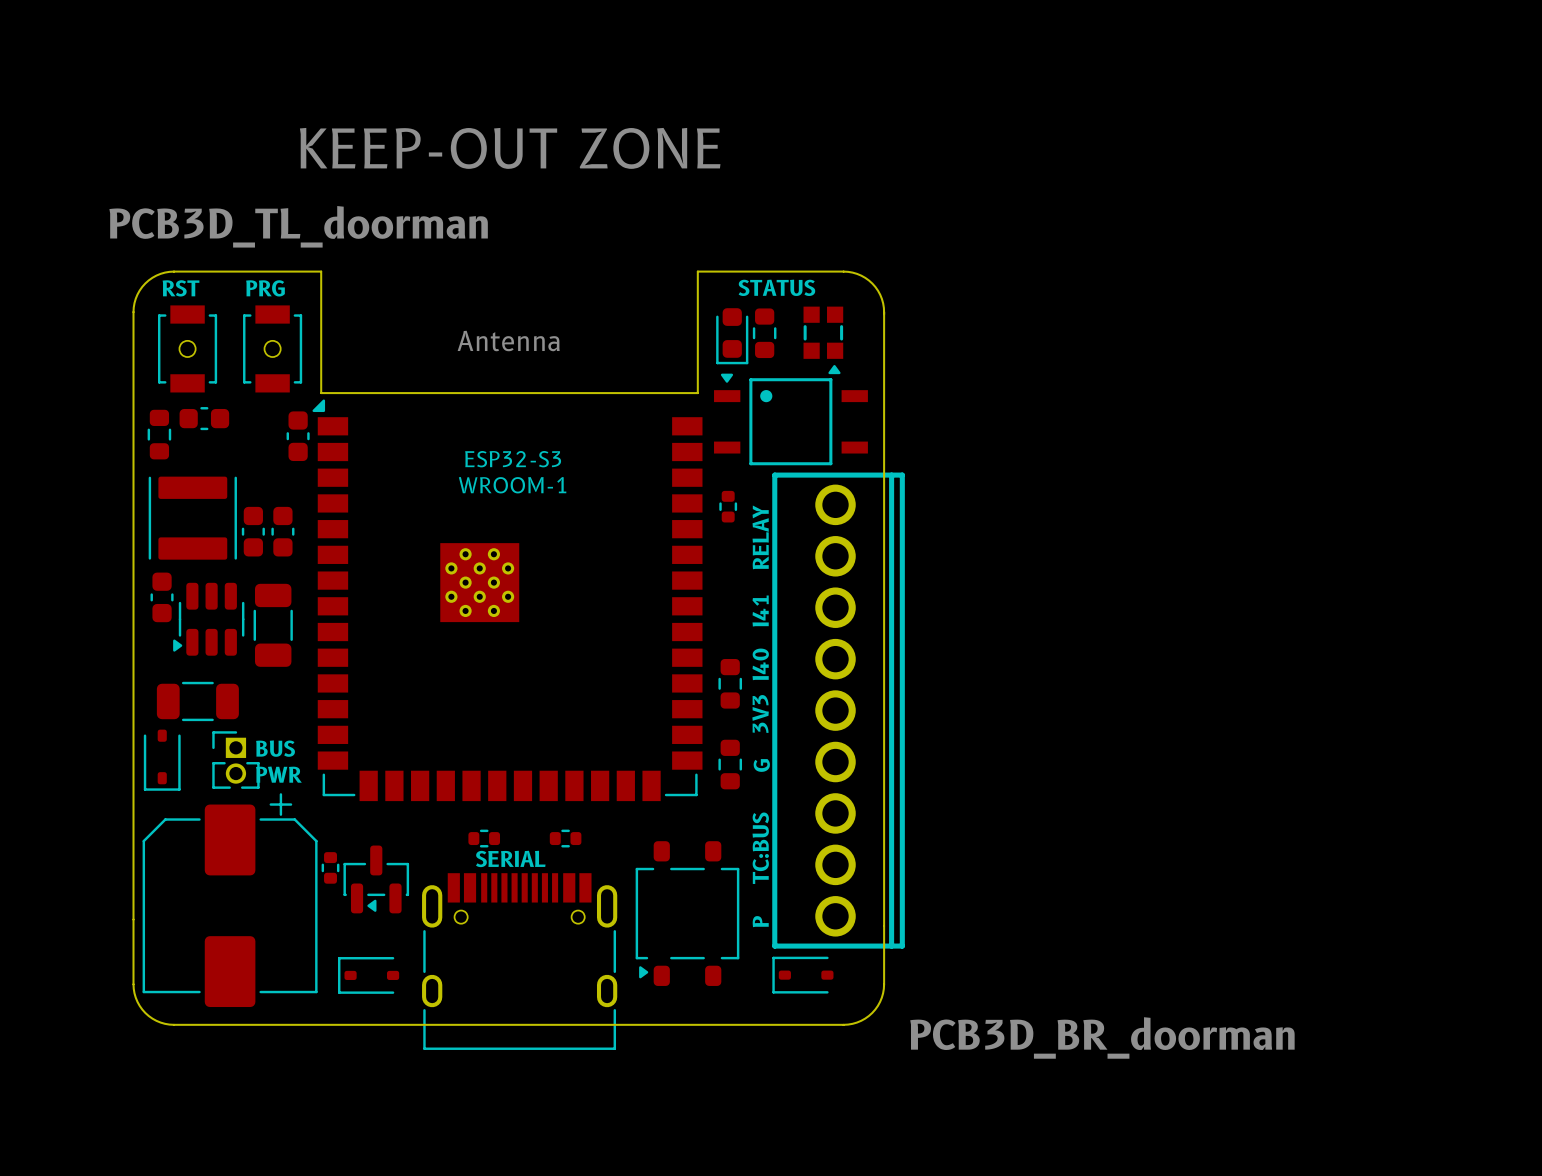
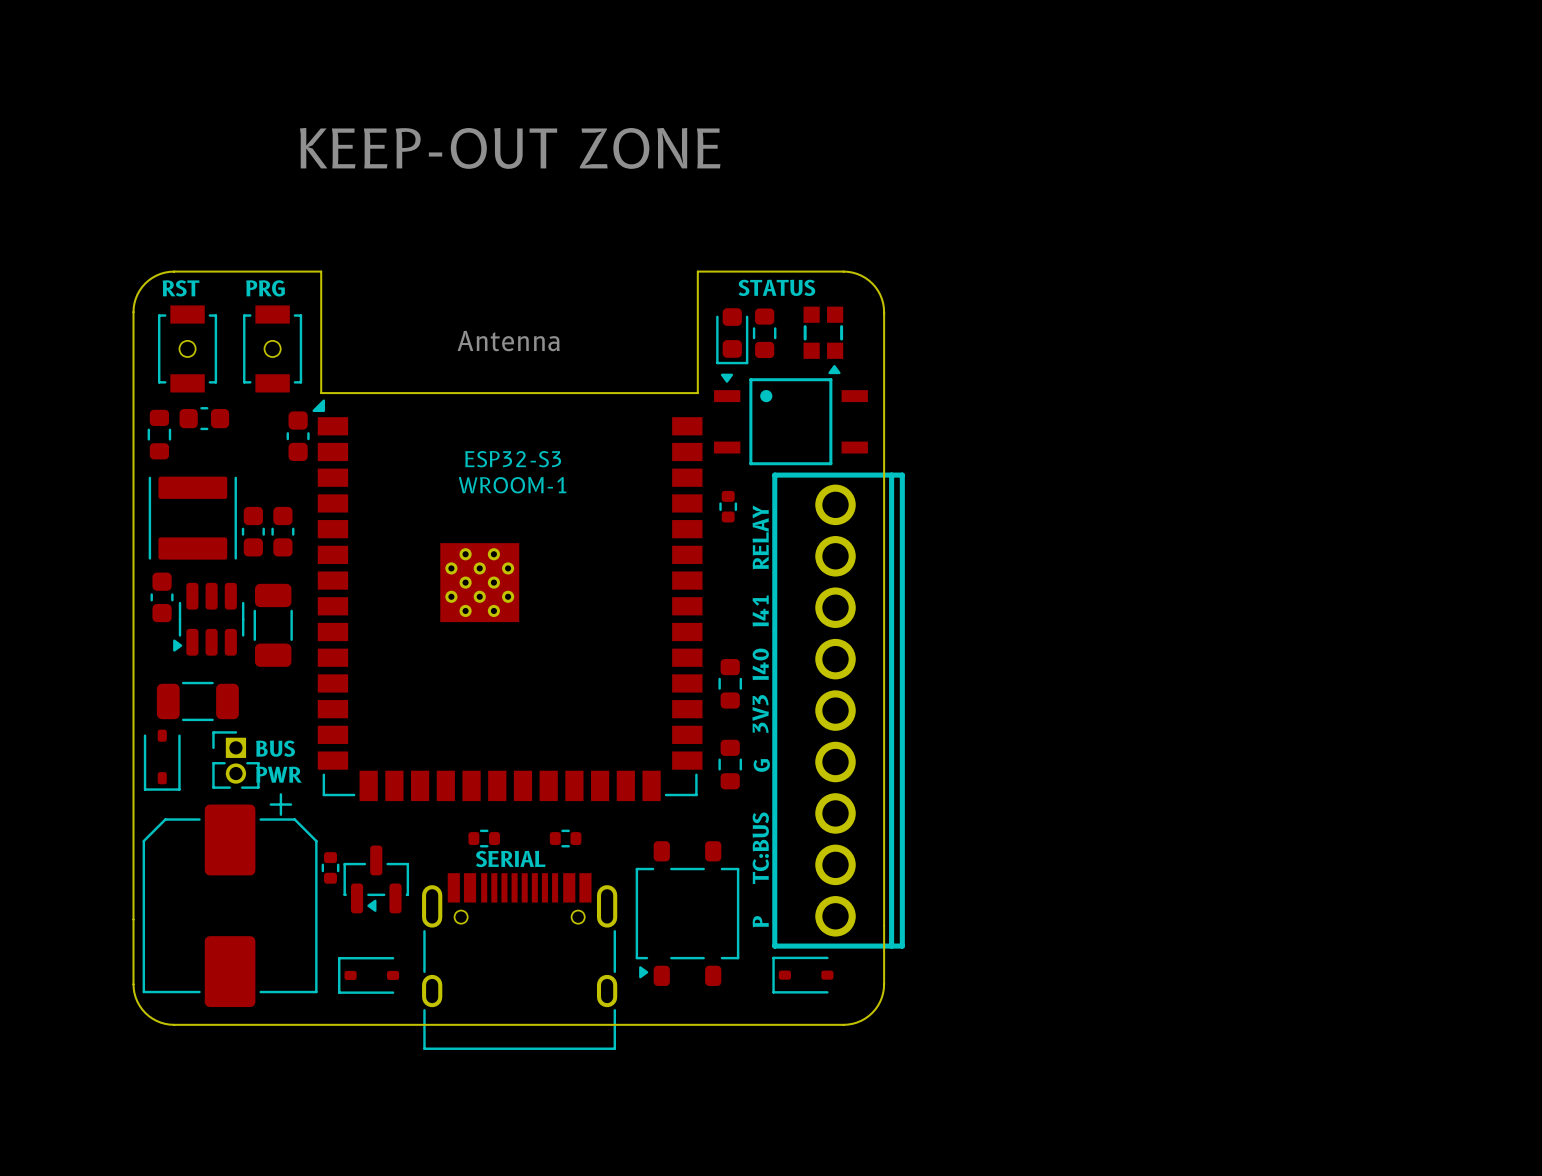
text: PCB3D_TL_doorman (298, 226) -> none
text: PCB3D_BR_doorman (1102, 1037) -> none

